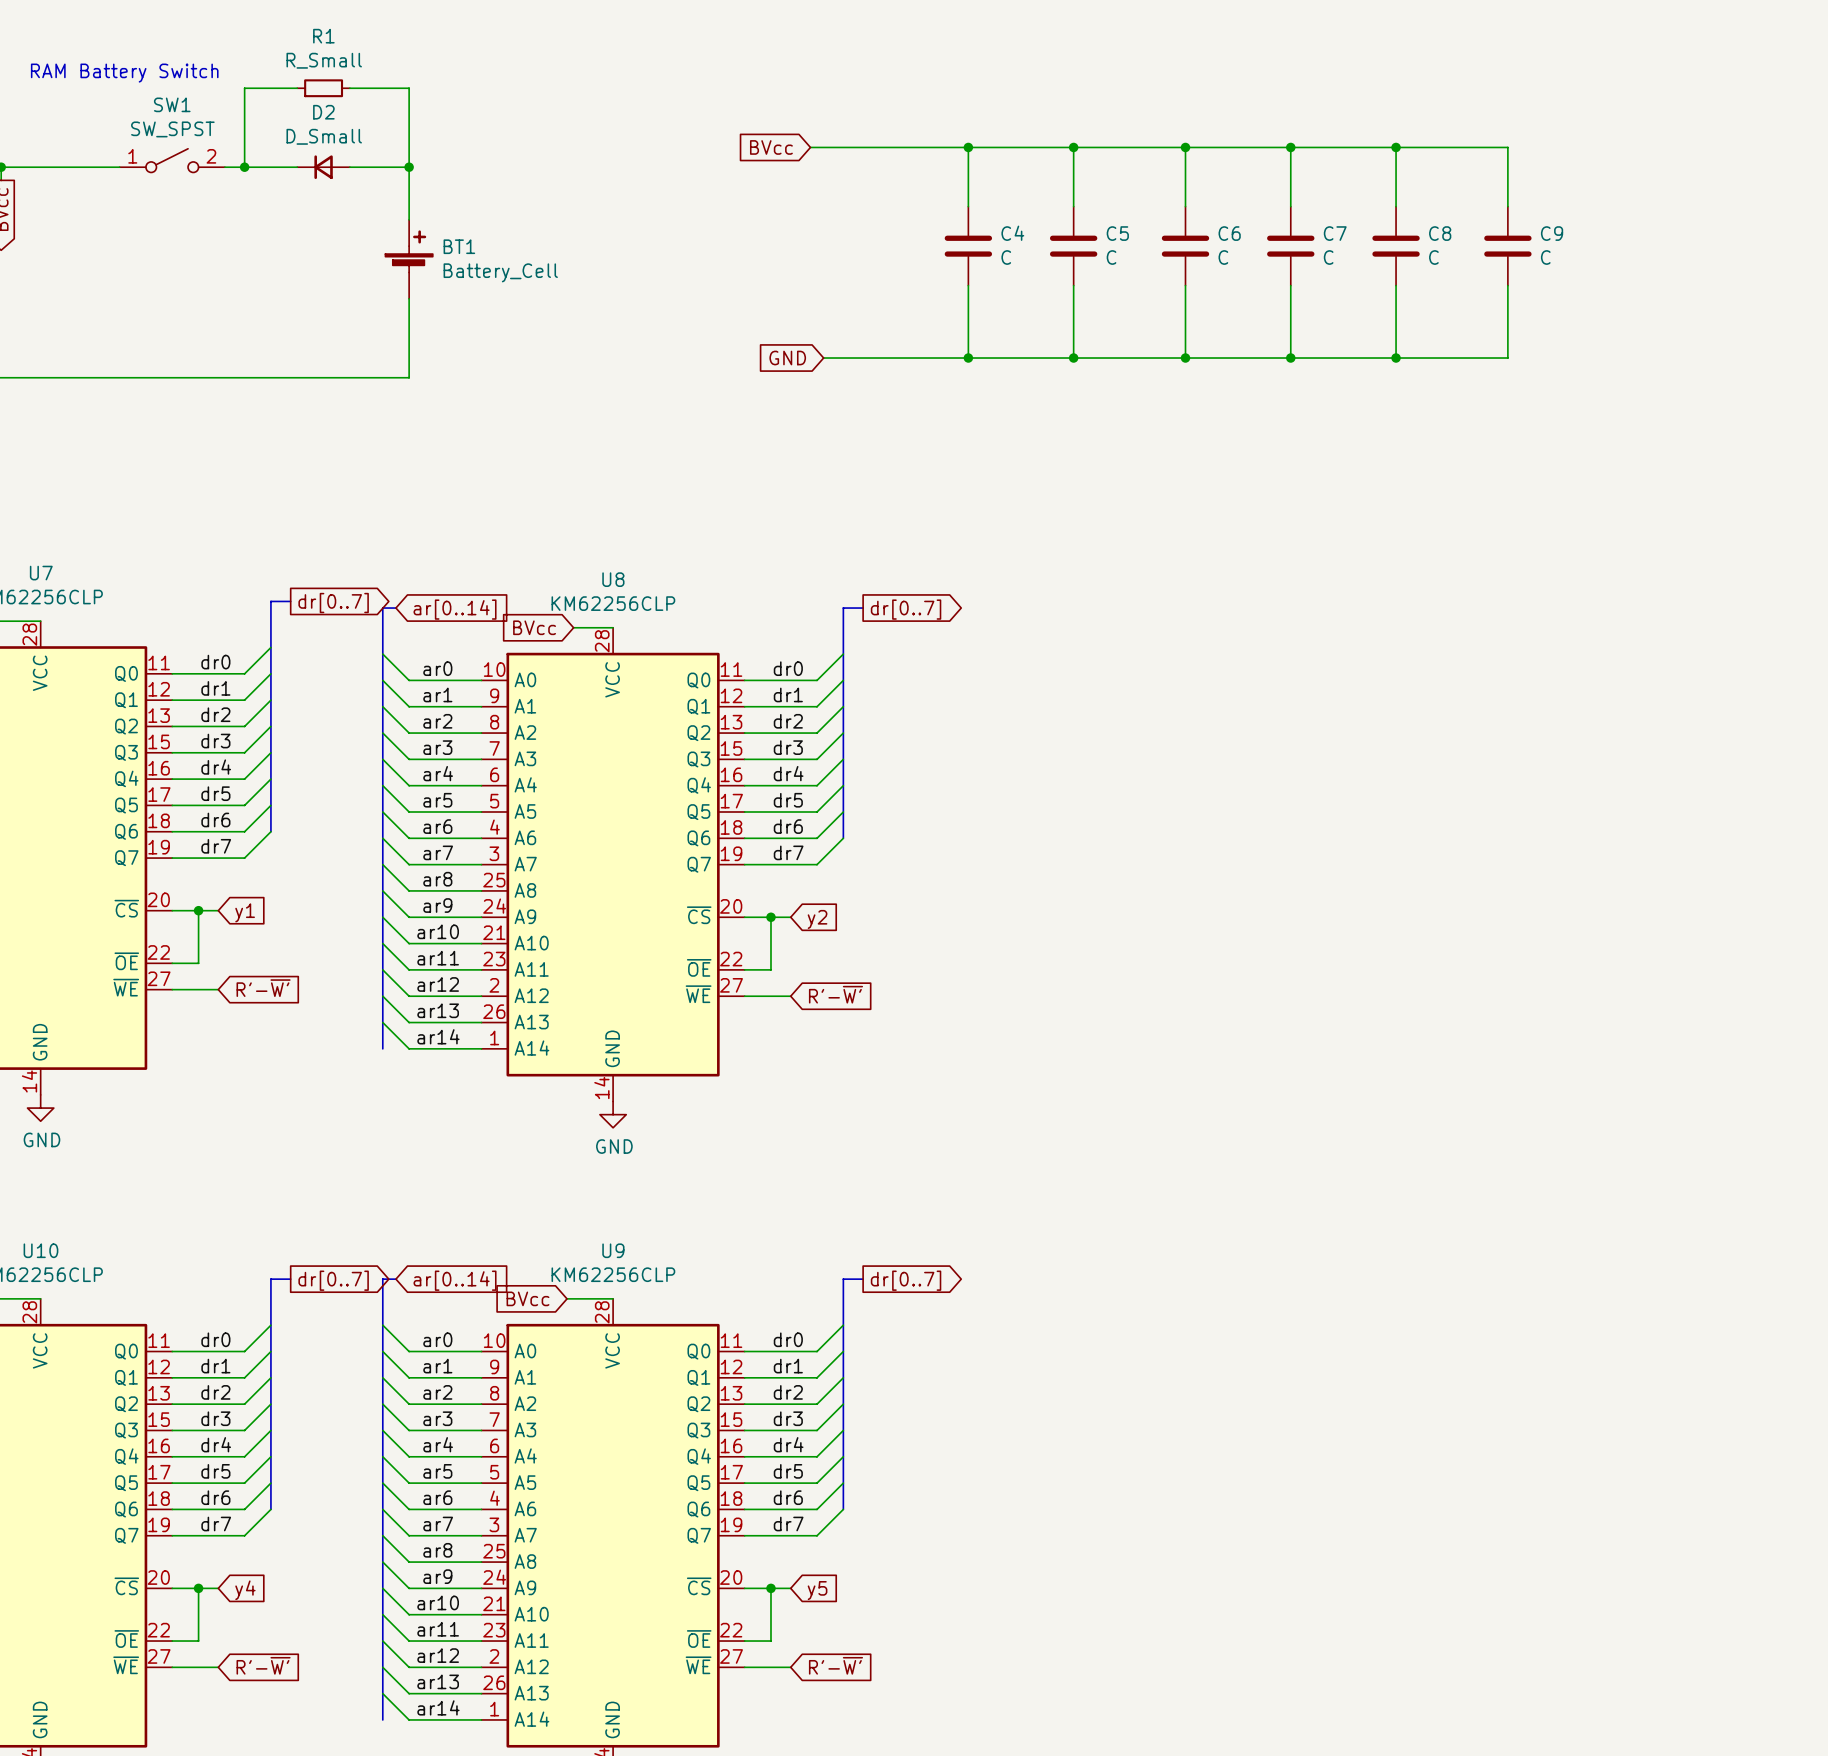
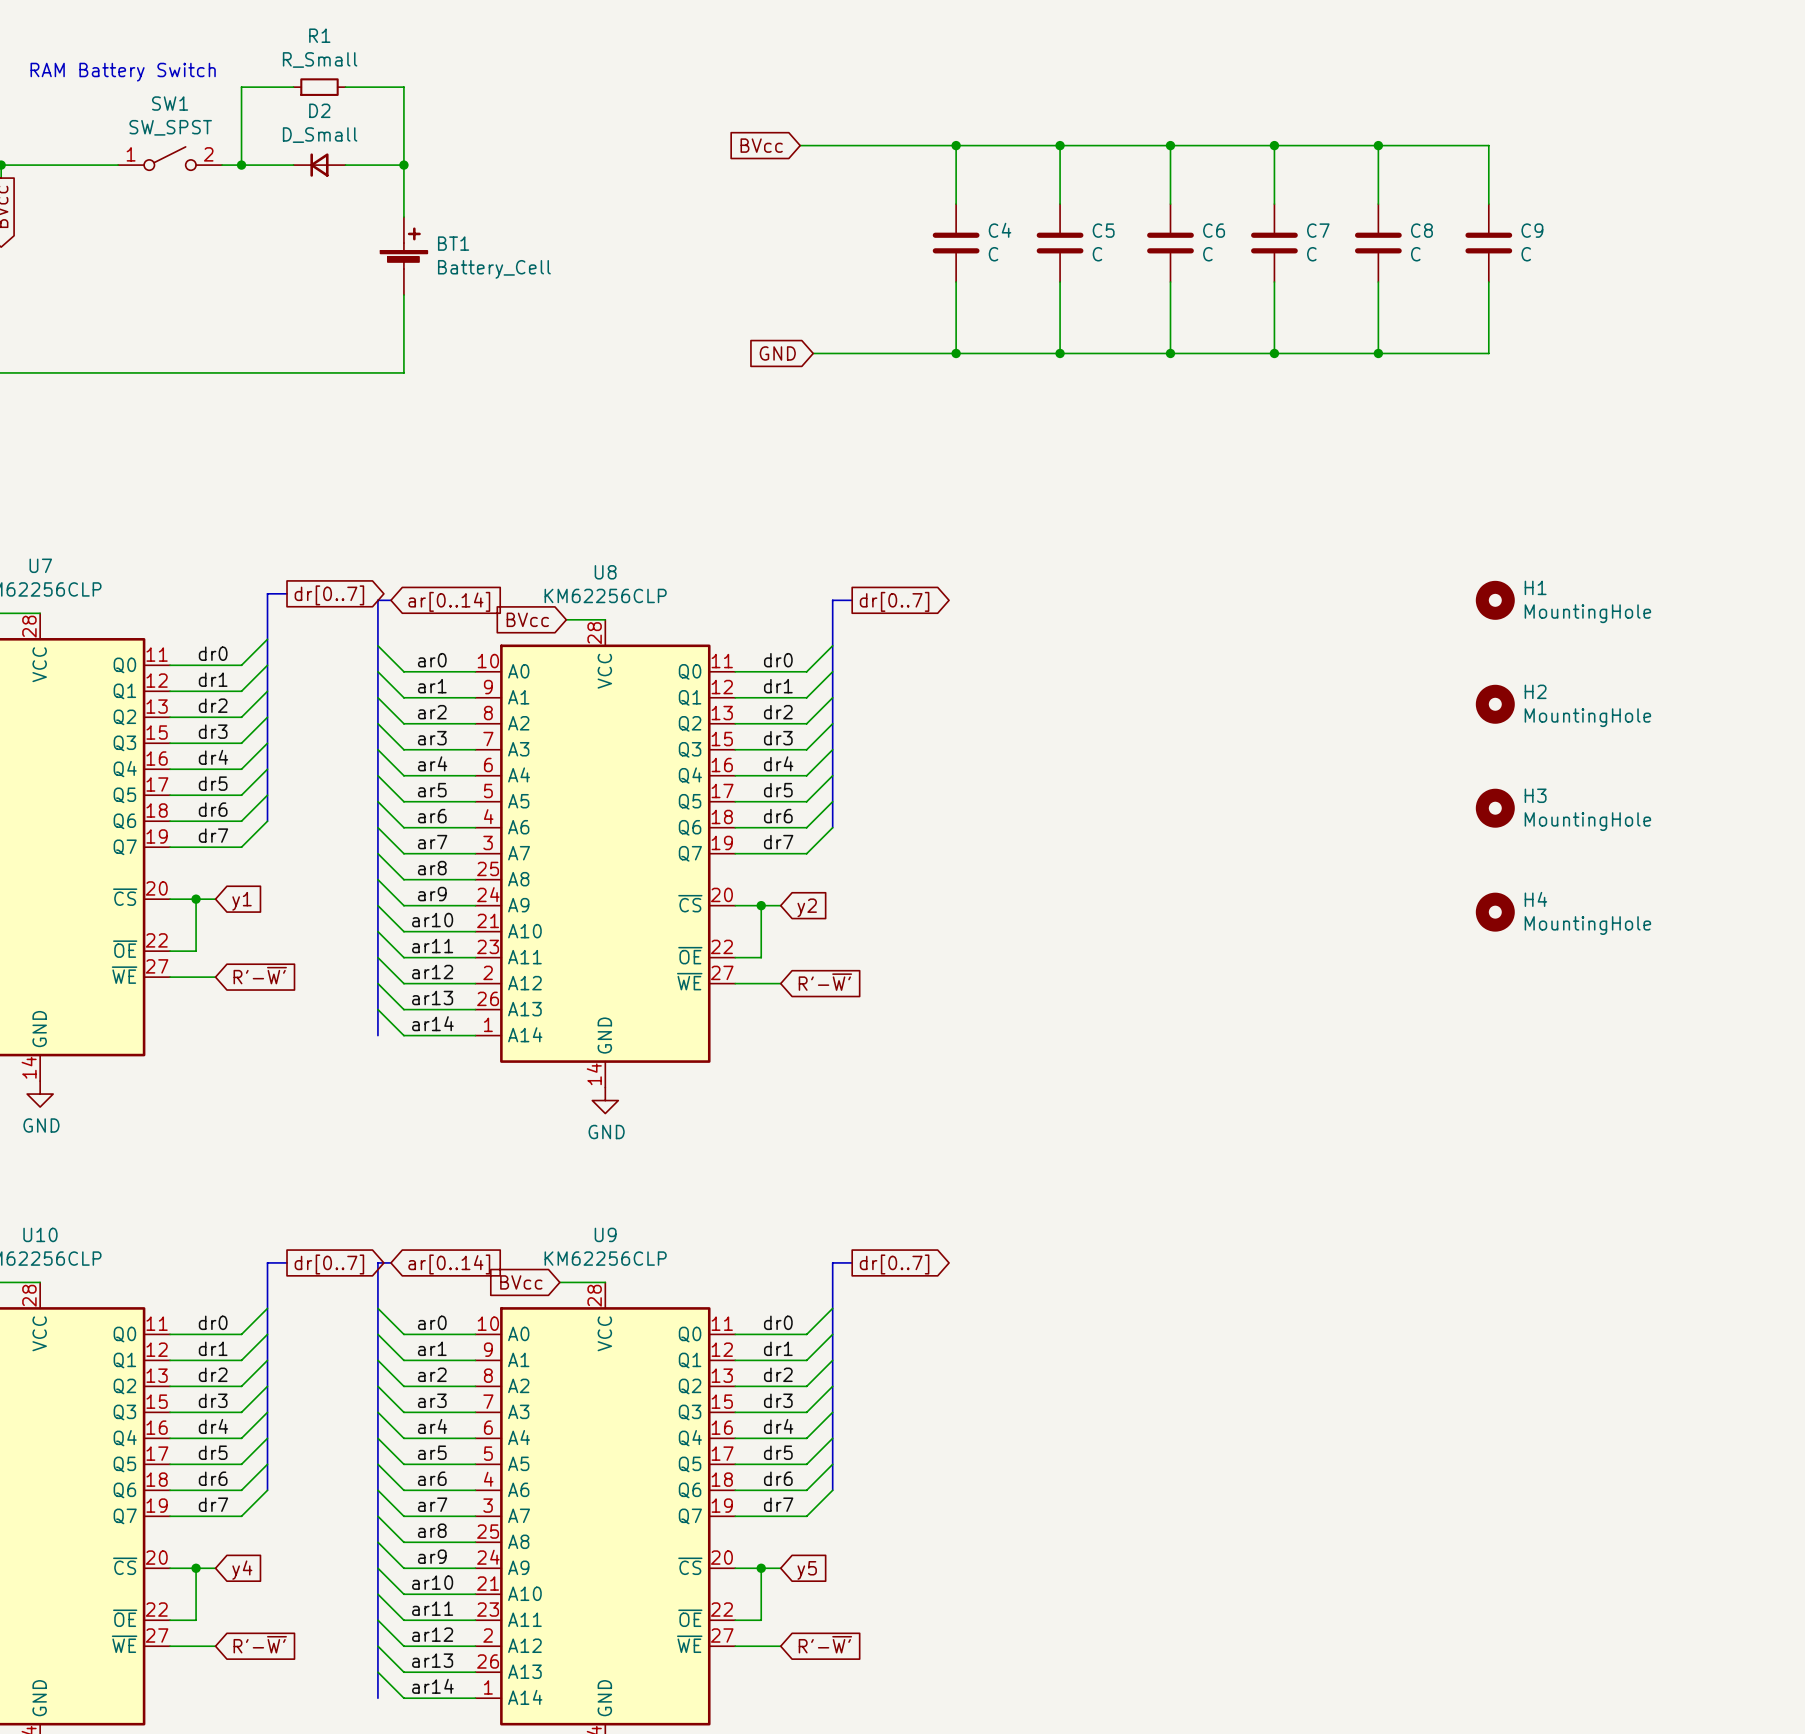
H1: none -> MountingHole (1495, 600)
H2: none -> MountingHole (1495, 704)
H3: none -> MountingHole (1495, 808)
H4: none -> MountingHole (1495, 912)

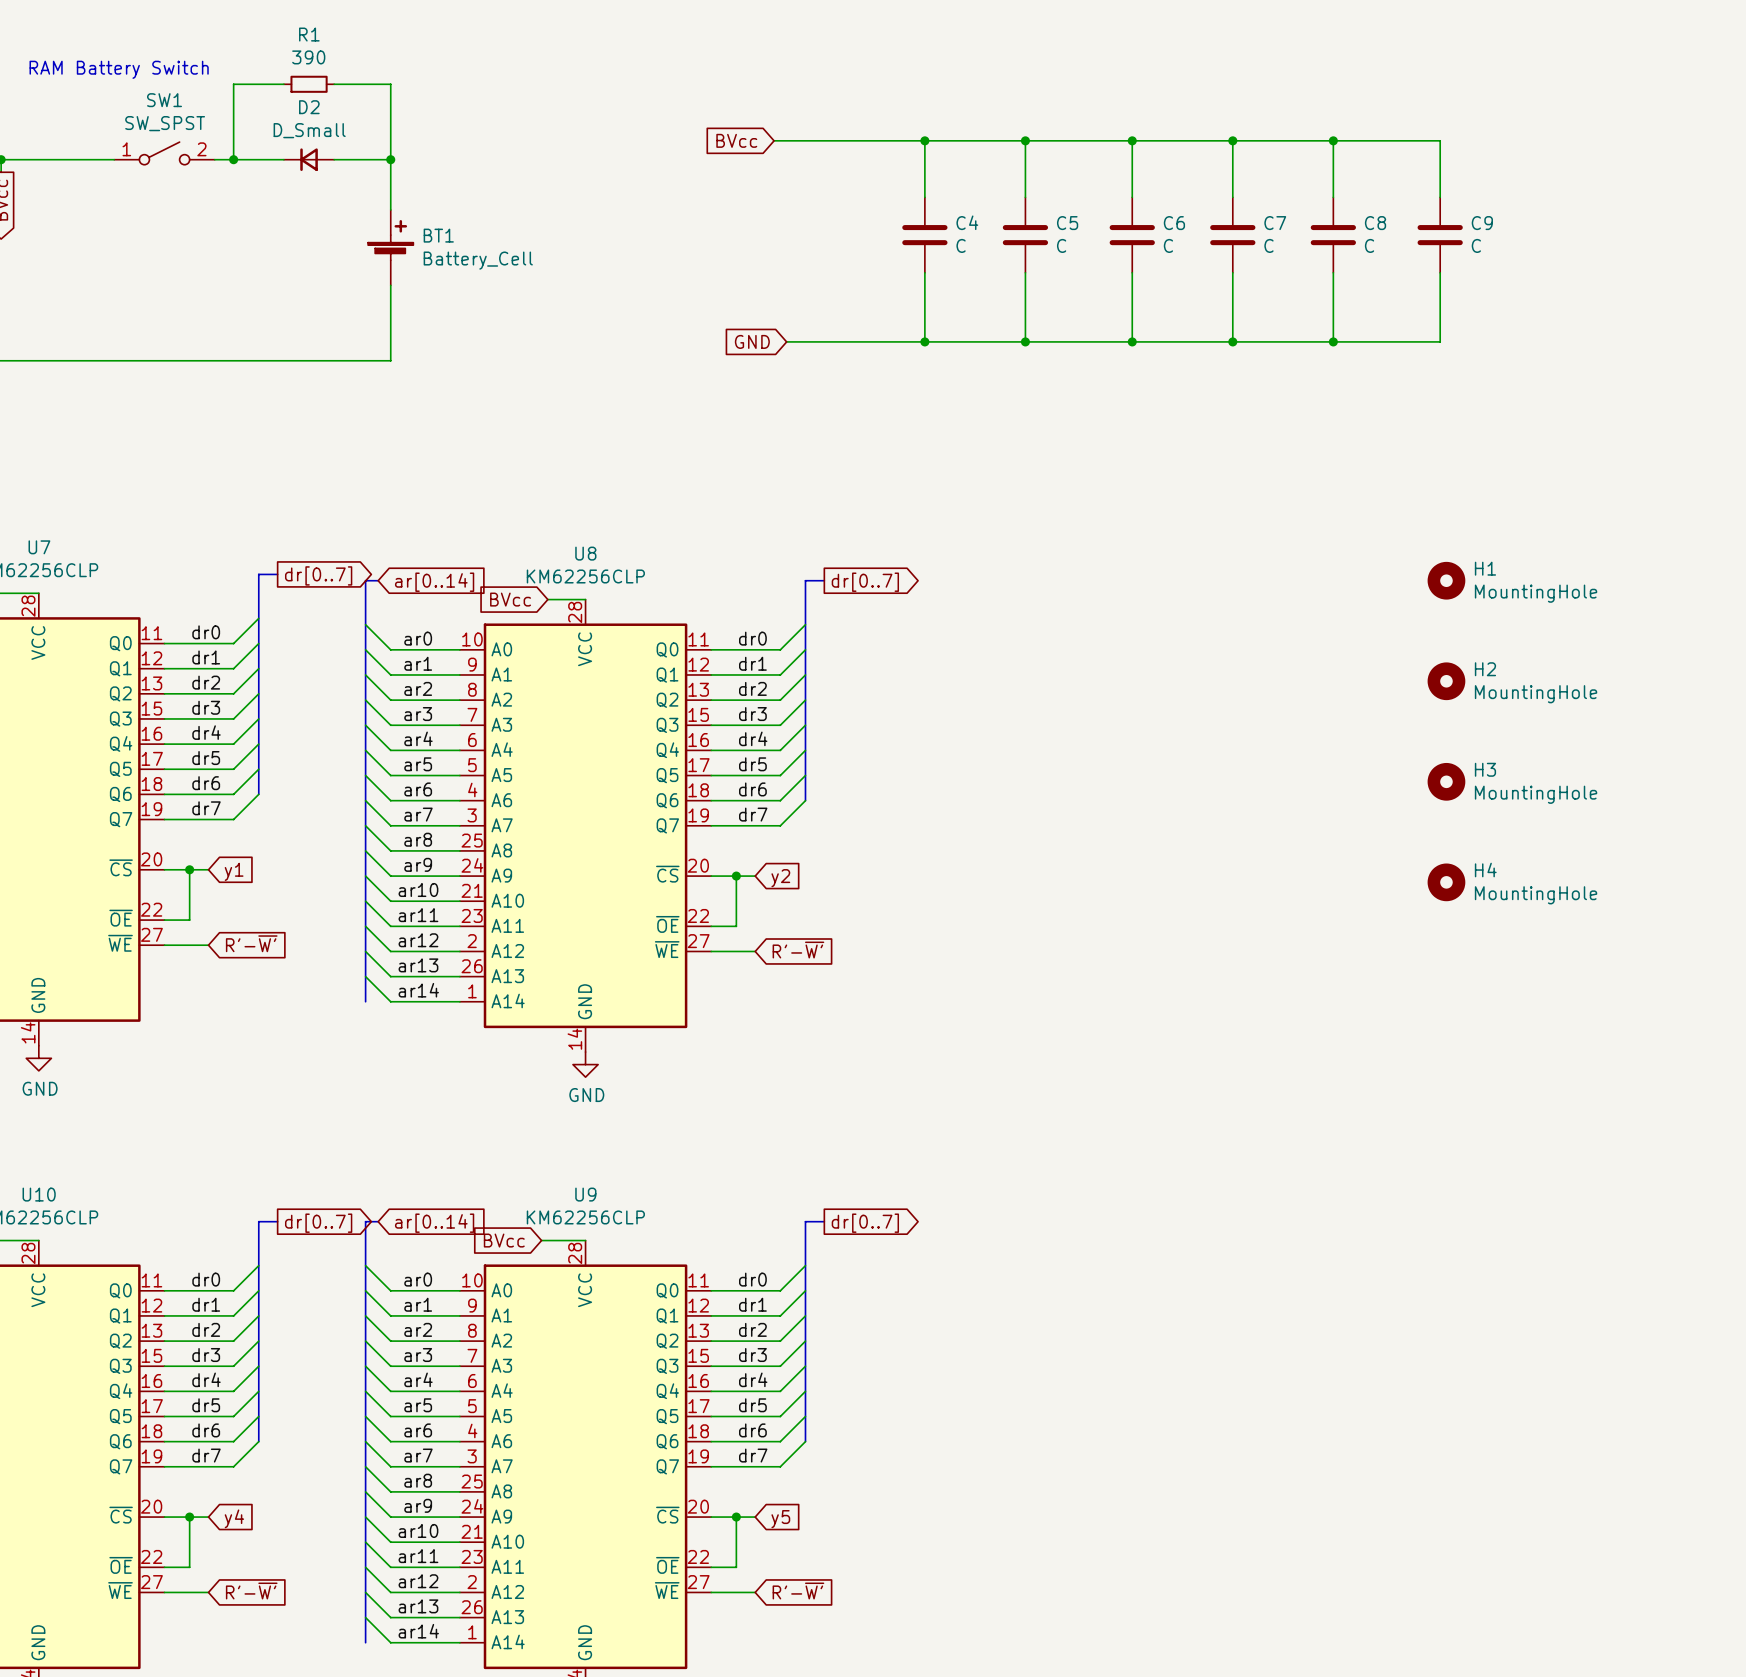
R1 value: R_Small (320, 59) -> 390 (308, 57)

